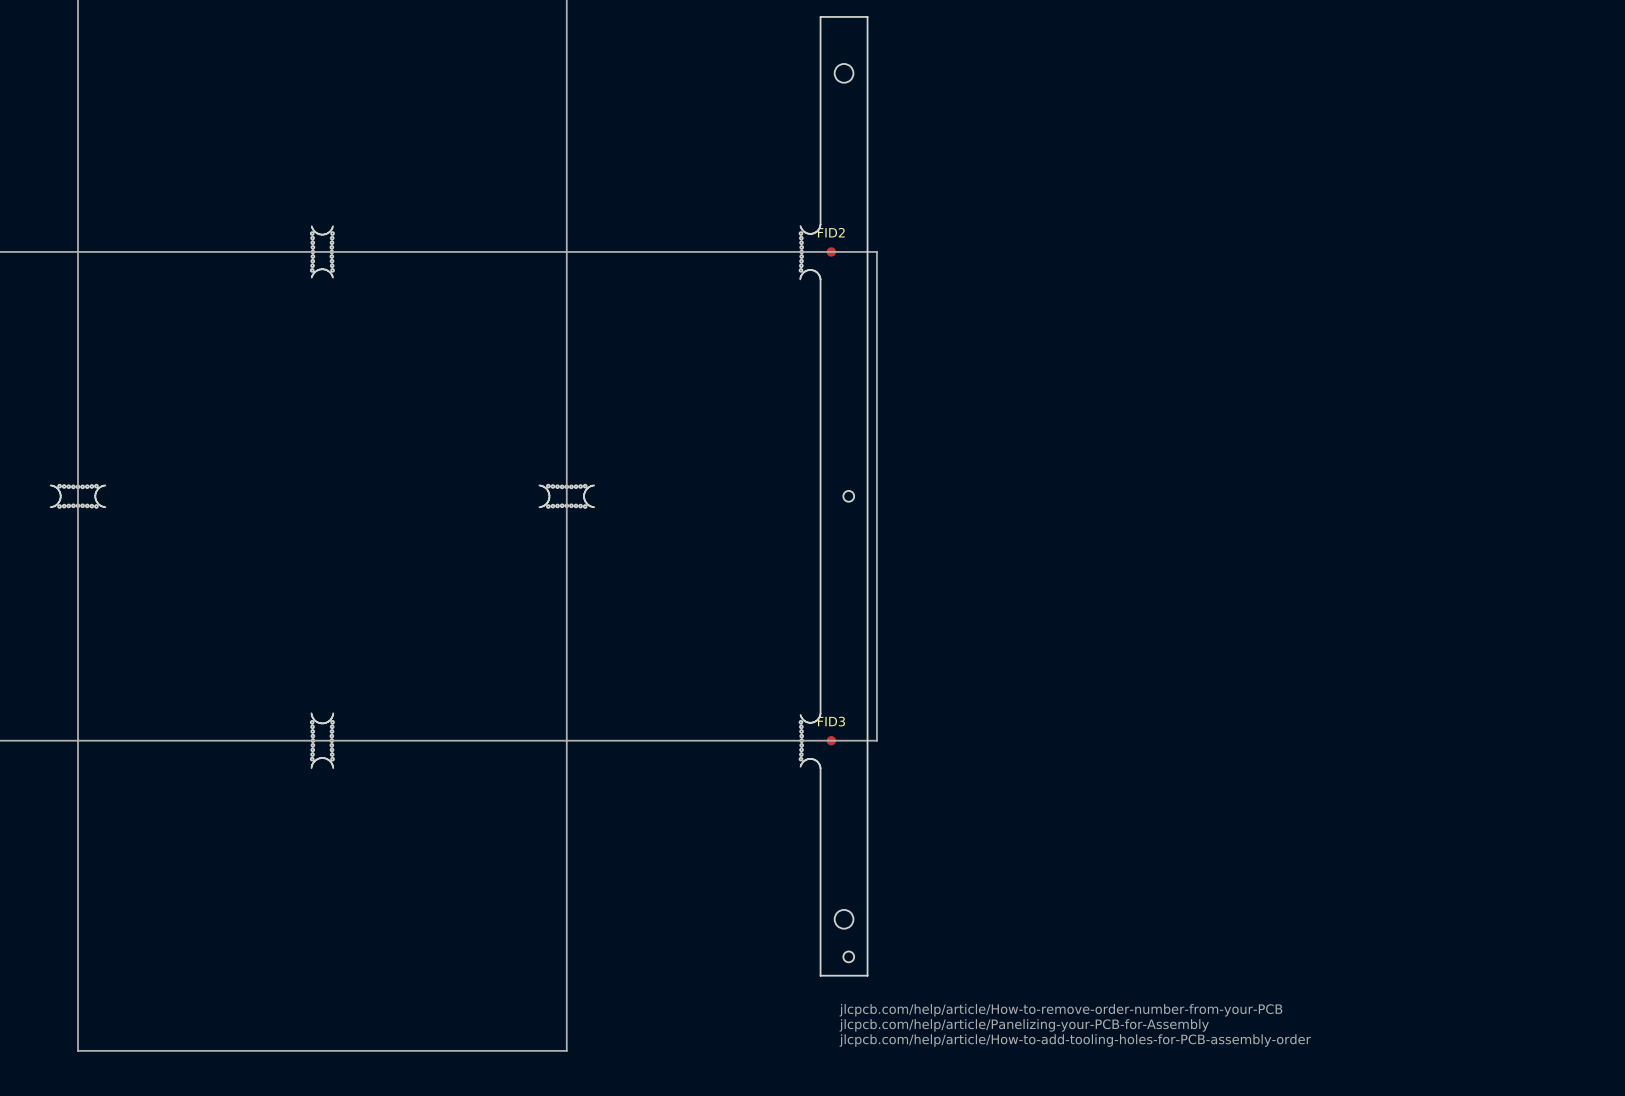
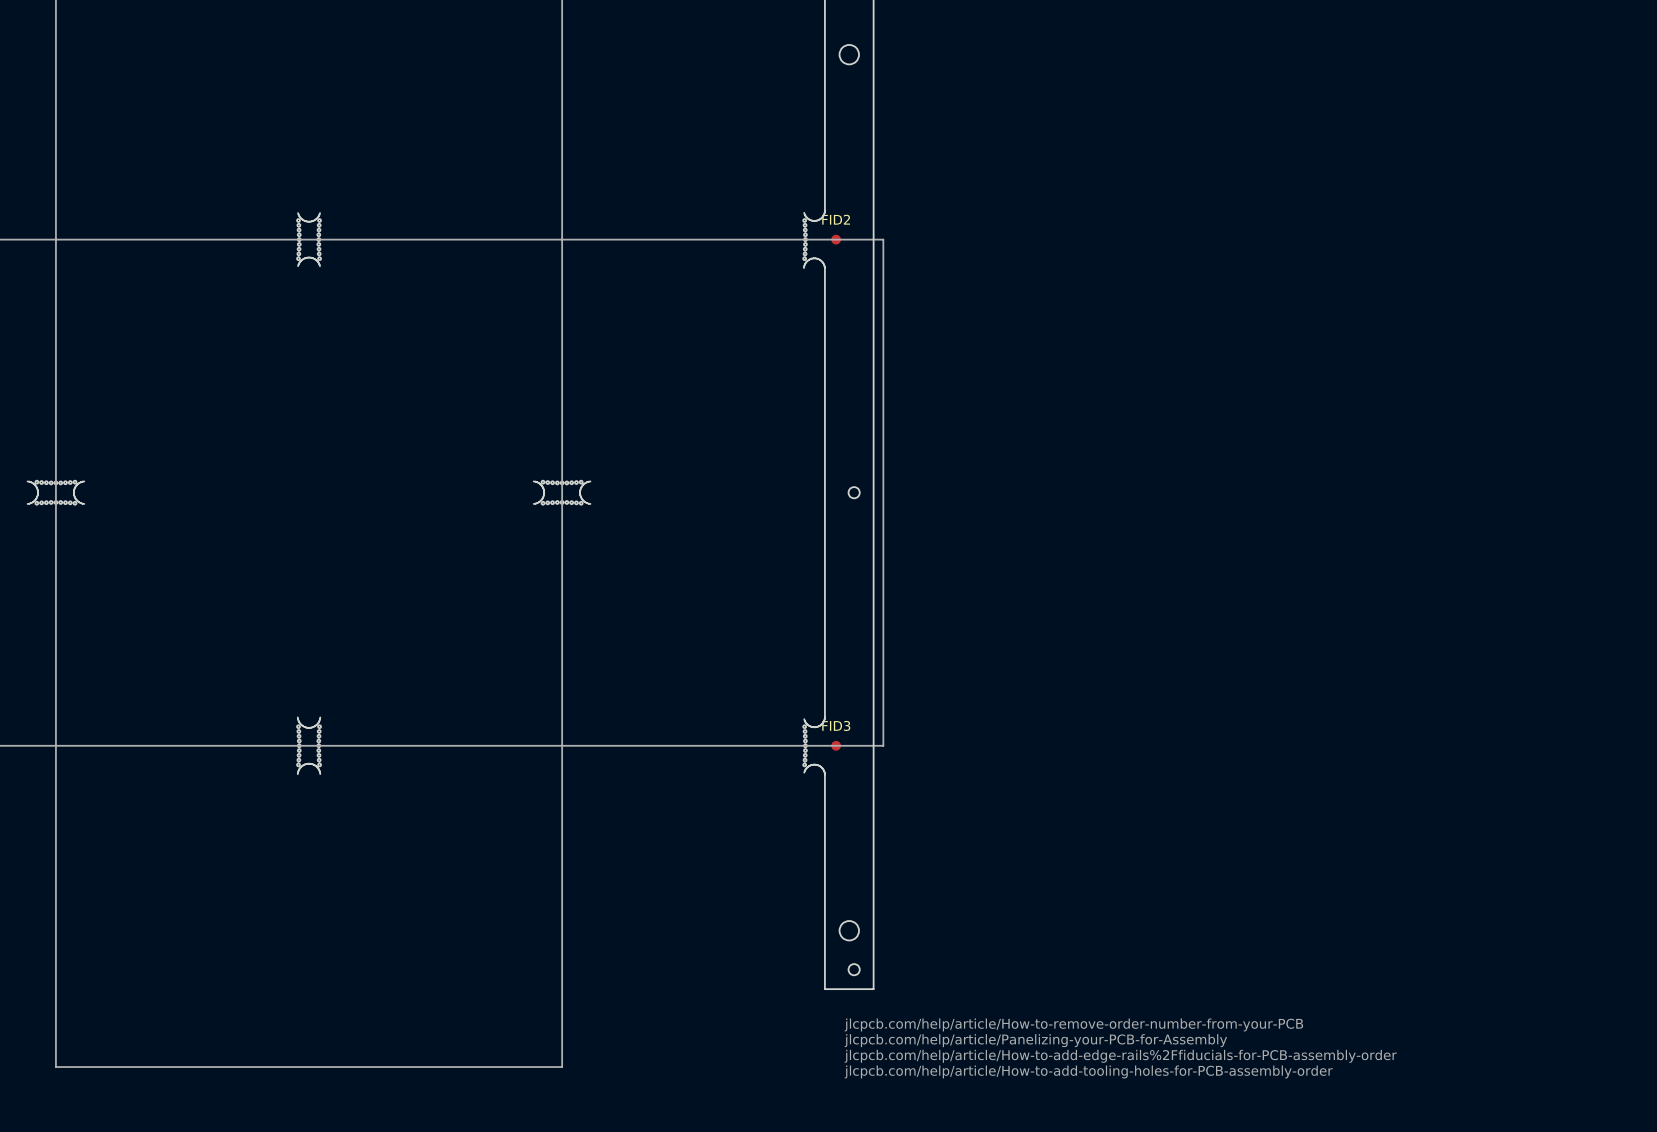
text: jlcpcb.com/help/article/How-to-add-tooling-holes-for-PCB-assembly-order (1075, 1040) -> jlcpcb.com/help/article/How-to-add-edge-rails%2Ffiducials-for-PCB-assembly-order (1120, 1056)
text: none -> jlcpcb.com/help/article/How-to-add-tooling-holes-for-PCB-assembly-order (1088, 1071)

